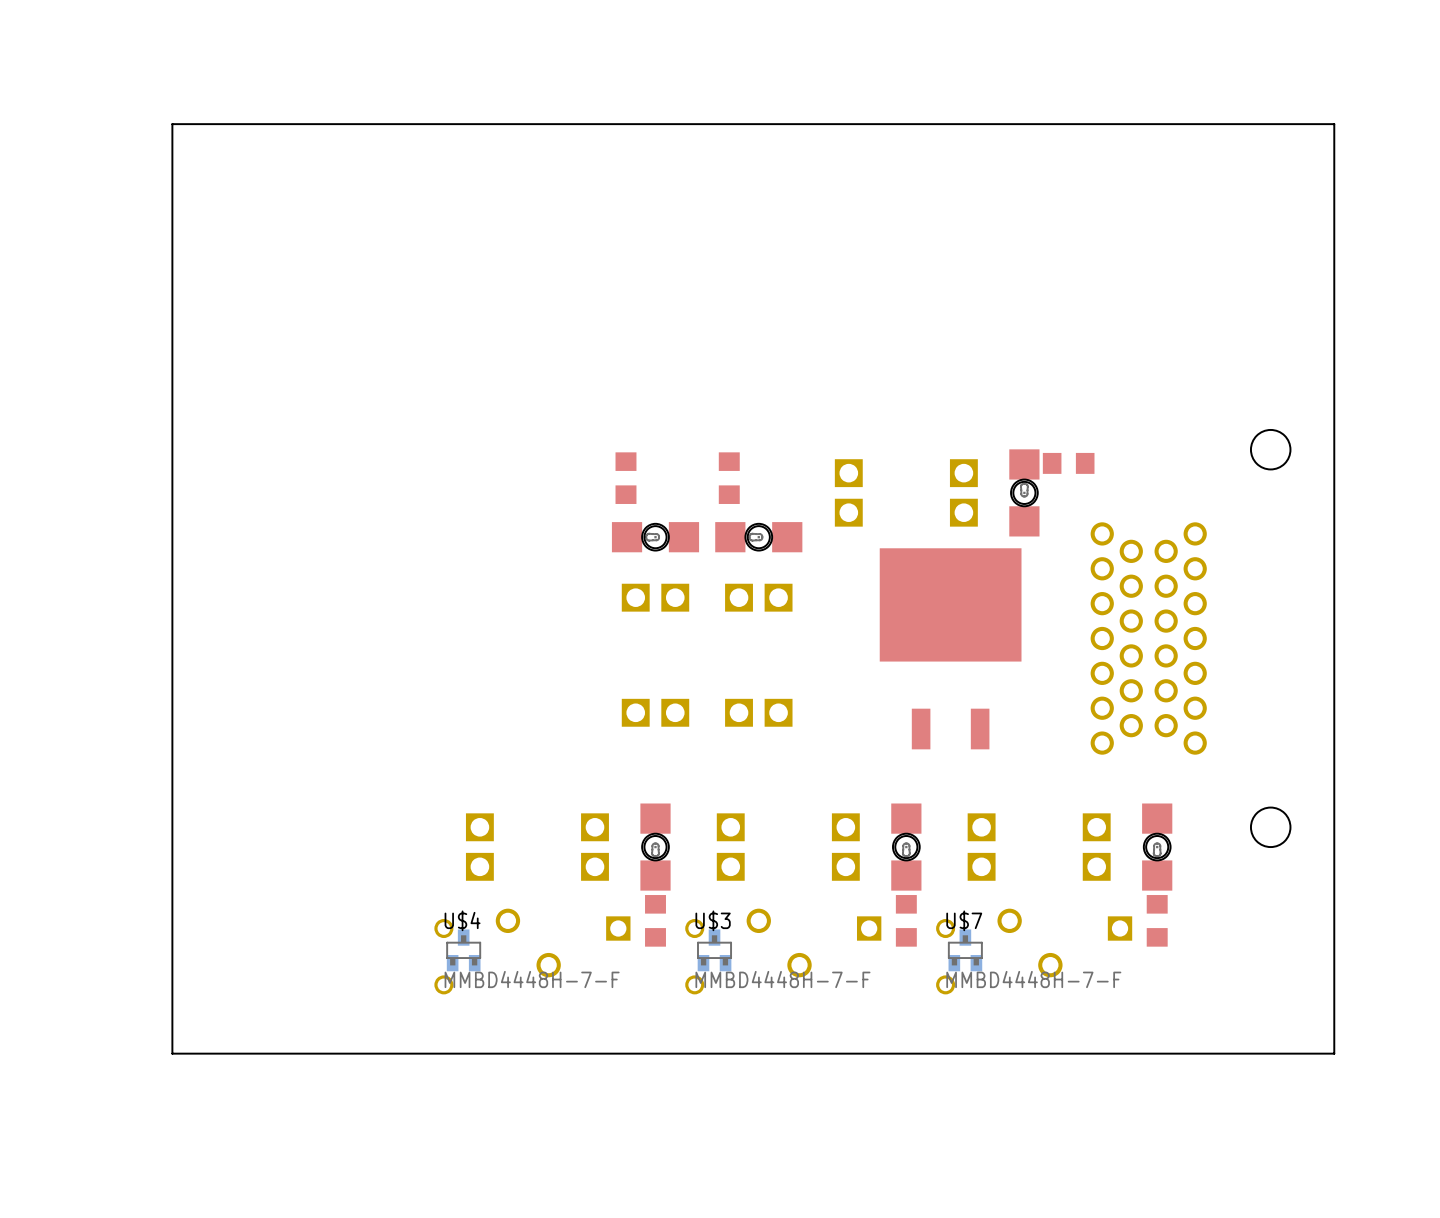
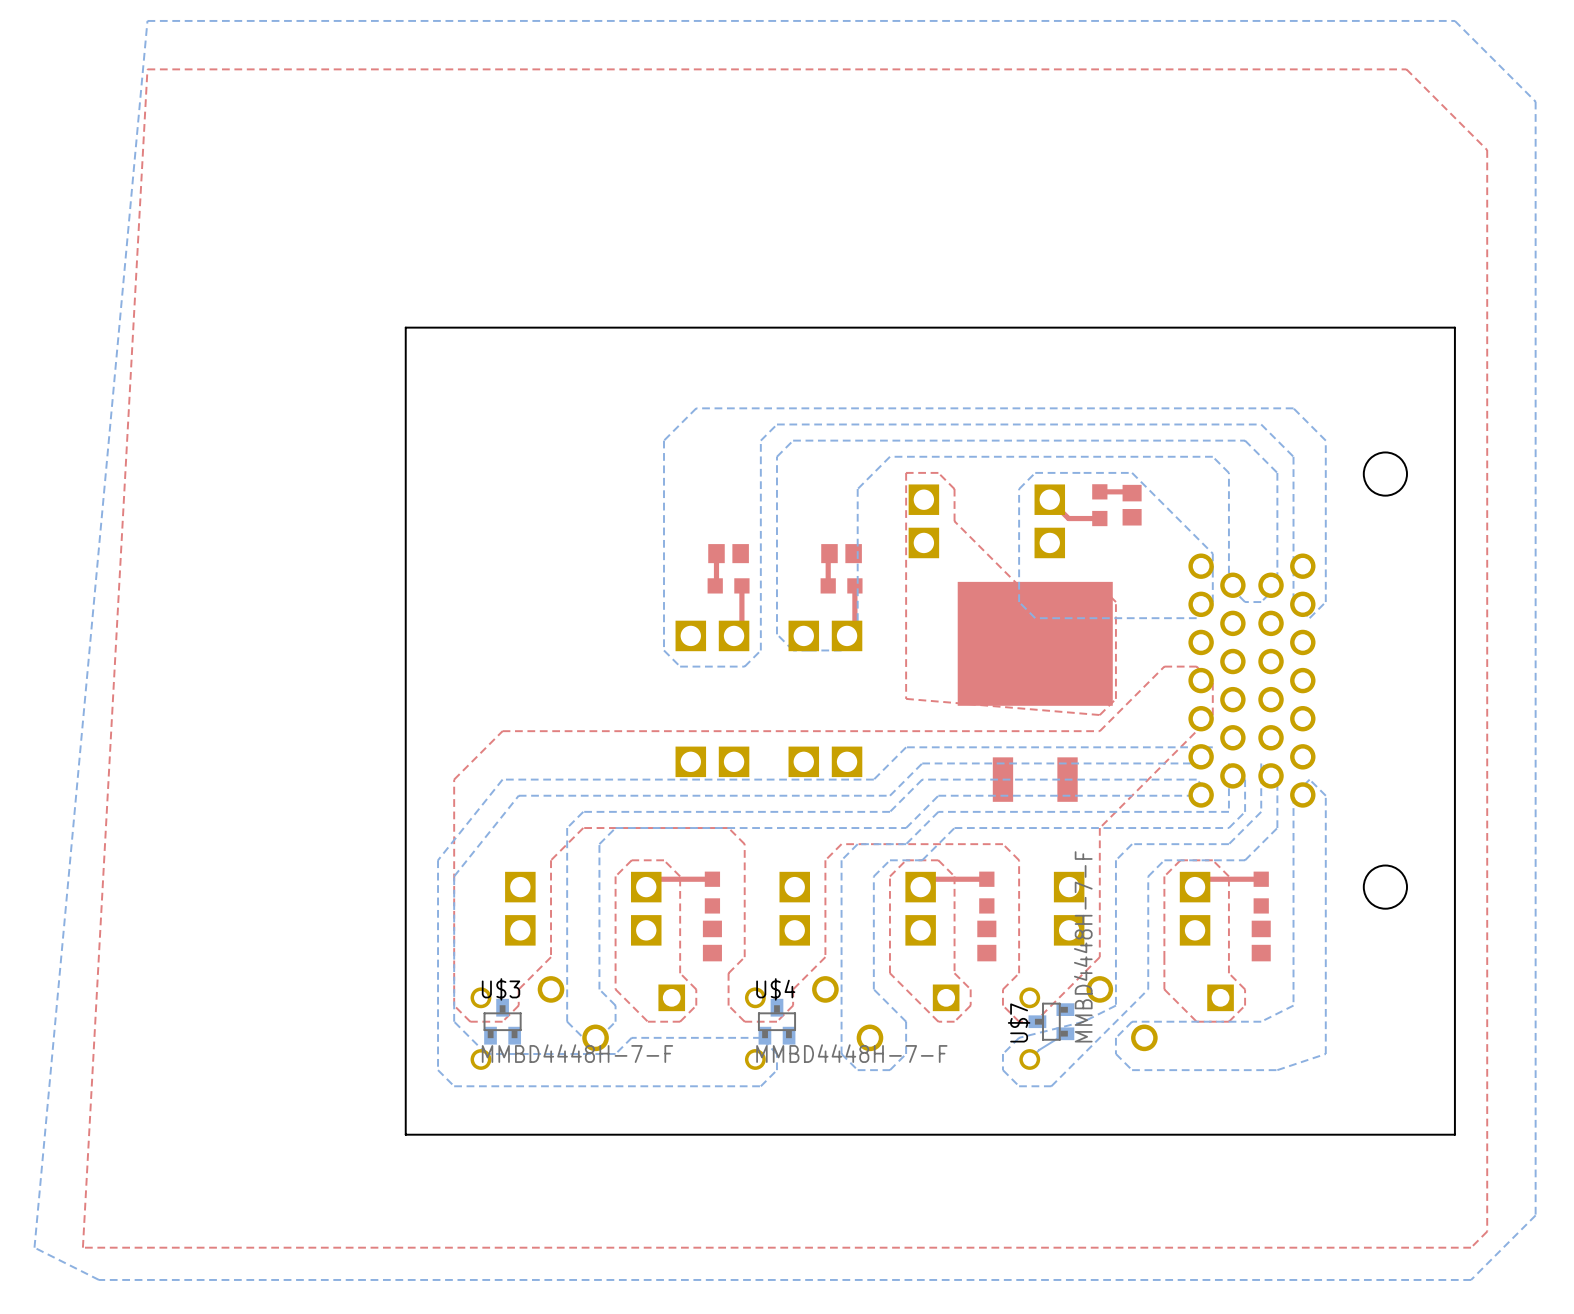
bottom zone outline: none -> (1454, 20) (147, 20) (34, 1247) (99, 1279) (1471, 1279) (1535, 1215) (1535, 101) (1454, 20)
top zone outline: none -> (1406, 69) (147, 69) (82, 1247) (1471, 1247) (1487, 1231) (1487, 150) (1406, 69)
board edge: (1334, 315) (1334, 124) (172, 124) (172, 1053) (375, 1053) -> (1454, 327) (405, 327) (405, 1134)
bottom zone outline: none -> (1293, 408) (1325, 440) (1325, 602) (1309, 618) (1293, 602) (1293, 456) (1261, 424) (776, 424) (760, 440) (760, 650) (744, 666) (680, 666) (664, 650) (664, 440) (696, 408) (1293, 408)
bottom zone outline: none -> (1245, 440) (793, 440) (776, 456) (776, 634) (793, 650) (841, 650) (857, 634) (857, 489) (889, 456) (1212, 456) (1228, 472) (1228, 585) (1245, 602) (1261, 602) (1277, 585) (1277, 472) (1245, 440)
top zone outline: none -> (938, 472) (906, 472) (906, 698) (1099, 715) (1115, 698) (1115, 602) (1099, 585) (1019, 585) (954, 521) (954, 489) (938, 472)
bottom zone outline: none -> (1132, 472) (1035, 472) (1019, 489) (1019, 602) (1035, 618) (1196, 618) (1212, 602) (1212, 553) (1132, 472)
part: (1068, 463) -> none
top track: none -> (1099, 491) (1132, 493)
top track: none -> (1049, 499) (1068, 518) (1099, 518)
part: (625, 478) -> none
part: (729, 478) -> none
part: none -> (1099, 505)
part: none -> (1132, 505)
part: (1024, 492) -> none
top track: none -> (716, 553) (715, 585)
part: none -> (728, 553)
top track: none -> (829, 553) (828, 585)
part: none -> (841, 553)
part: (655, 537) -> none
part: (758, 537) -> none
part: none -> (728, 585)
top track: none -> (741, 585) (741, 628) (734, 635)
part: none -> (841, 585)
top track: none -> (854, 585) (854, 628) (847, 635)
top zone outline: none -> (1196, 666) (1164, 666) (1099, 731) (502, 731) (454, 779) (454, 1005) (470, 1021) (502, 1021) (518, 1005) (518, 989) (551, 957) (551, 860) (583, 828) (728, 828) (744, 844) (744, 957) (728, 973) (728, 1005) (744, 1021) (776, 1021) (793, 1005) (793, 989) (825, 957) (825, 860) (841, 844) (1002, 844) (1019, 860) (1019, 973) (1002, 989) (1002, 1005) (1019, 1021) (1035, 1021) (1099, 957) (1099, 828) (1212, 715) (1212, 682) (1196, 666)
bottom zone outline: none -> (1212, 747) (1196, 763) (922, 763) (889, 795) (518, 795) (454, 876) (454, 1021) (486, 1053) (615, 1053) (631, 1037) (760, 1037) (776, 1053) (776, 1070) (760, 1086) (454, 1086) (438, 1070) (438, 860) (502, 779) (873, 779) (906, 747) (1212, 747)
bottom zone outline: none -> (1228, 763) (1228, 811) (938, 811) (906, 844) (857, 844) (841, 860) (841, 1053) (857, 1070) (889, 1070) (906, 1053) (906, 1021) (873, 989) (873, 876) (889, 860) (922, 860) (954, 828) (1228, 828) (1245, 811) (1245, 779) (1228, 763)
bottom zone outline: none -> (1261, 763) (1261, 811) (1228, 844) (1132, 844) (1115, 860) (1115, 1005) (1083, 1021) (1019, 1037) (1002, 1053) (1002, 1070) (1019, 1086) (1051, 1086) (1148, 989) (1148, 876) (1164, 860) (1245, 860) (1277, 828) (1277, 779) (1261, 763)
bottom zone outline: none -> (1196, 779) (1212, 795) (938, 795) (906, 828) (615, 828) (599, 844) (599, 989) (615, 1005) (615, 1021) (599, 1037) (583, 1037) (567, 1021) (567, 828) (583, 811) (889, 811) (922, 779) (1196, 779)
bottom zone outline: none -> (1309, 779) (1293, 795) (1293, 1005) (1261, 1021) (1132, 1021) (1115, 1037) (1115, 1053) (1132, 1070) (1277, 1070) (1325, 1053) (1325, 795) (1309, 779)
top zone outline: none -> (664, 860) (631, 860) (615, 876) (615, 989) (647, 1021) (680, 1021) (696, 1005) (696, 989) (680, 973) (680, 876) (664, 860)
top zone outline: none -> (938, 860) (906, 860) (889, 876) (889, 973) (938, 1021) (954, 1021) (970, 1005) (970, 989) (954, 973) (954, 876) (938, 860)
top zone outline: none -> (1212, 860) (1180, 860) (1164, 876) (1164, 989) (1196, 1021) (1228, 1021) (1245, 1005) (1245, 989) (1228, 973) (1228, 876) (1212, 860)
top track: none -> (712, 879) (654, 879) (646, 887)
top track: none -> (986, 879) (928, 879) (920, 887)
top track: none -> (1261, 879) (1202, 879) (1195, 887)
part: none -> (712, 892)
part: none -> (986, 892)
part: none -> (1261, 892)
part: (655, 847) -> none
part: (906, 847) -> none
part: (1157, 847) -> none
part: none -> (712, 941)
part: none -> (986, 941)
part: none -> (1261, 941)
U$4 name: U$4 (462, 920) -> U$3 (501, 989)
part: (655, 920) -> none
U$3 name: U$3 (713, 920) -> U$4 (775, 989)
part: (906, 920) -> none
part: (1157, 920) -> none
U$7 rotation: 0° (965, 950) -> 90° counterclockwise (1051, 1021)
bottom track: none -> (1065, 1033) (1039, 1049) (1029, 1059)

